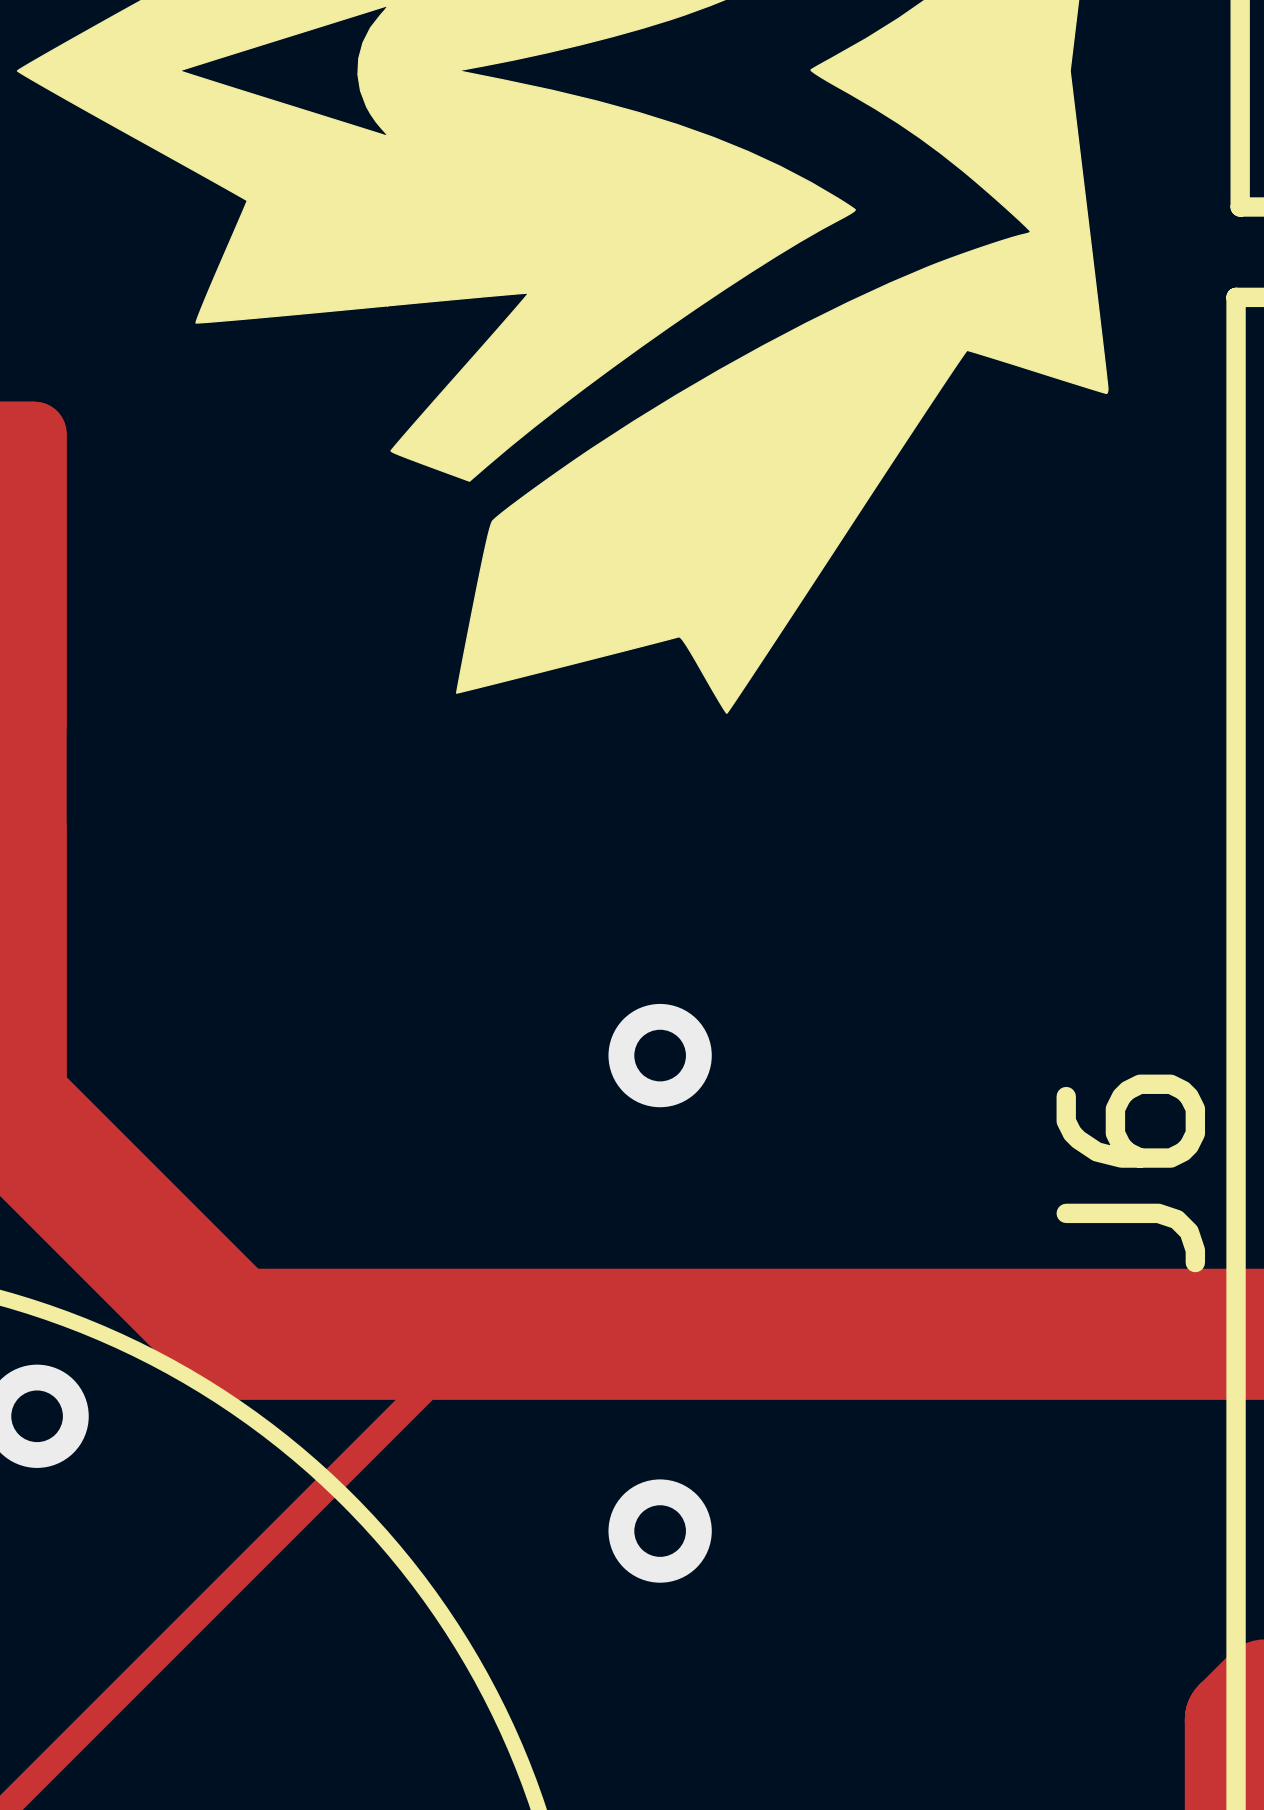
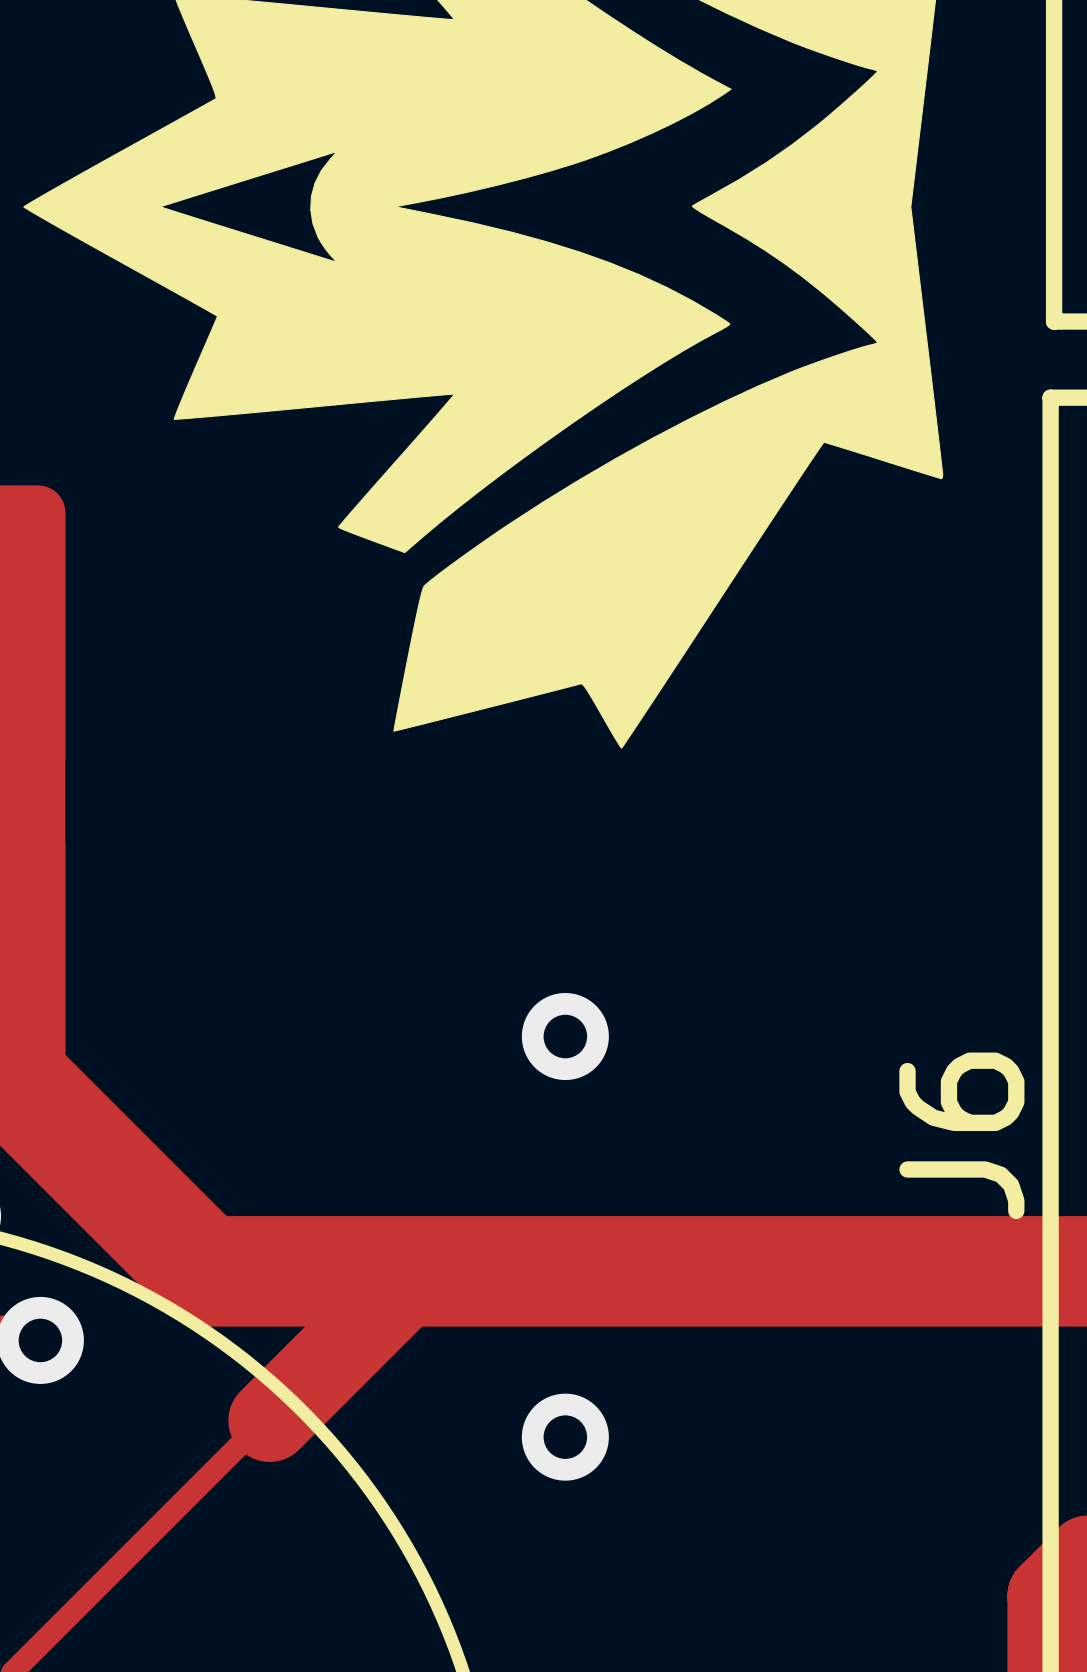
track: none -> (418, 1271) (269, 1420)

